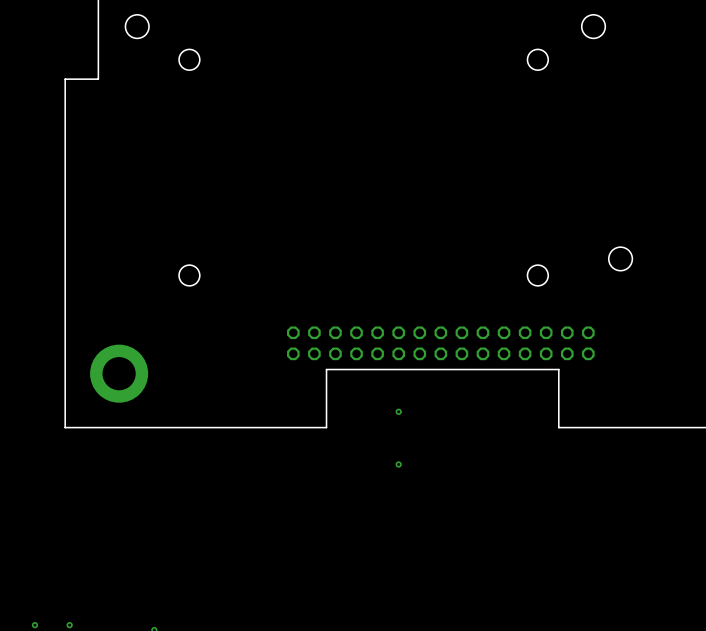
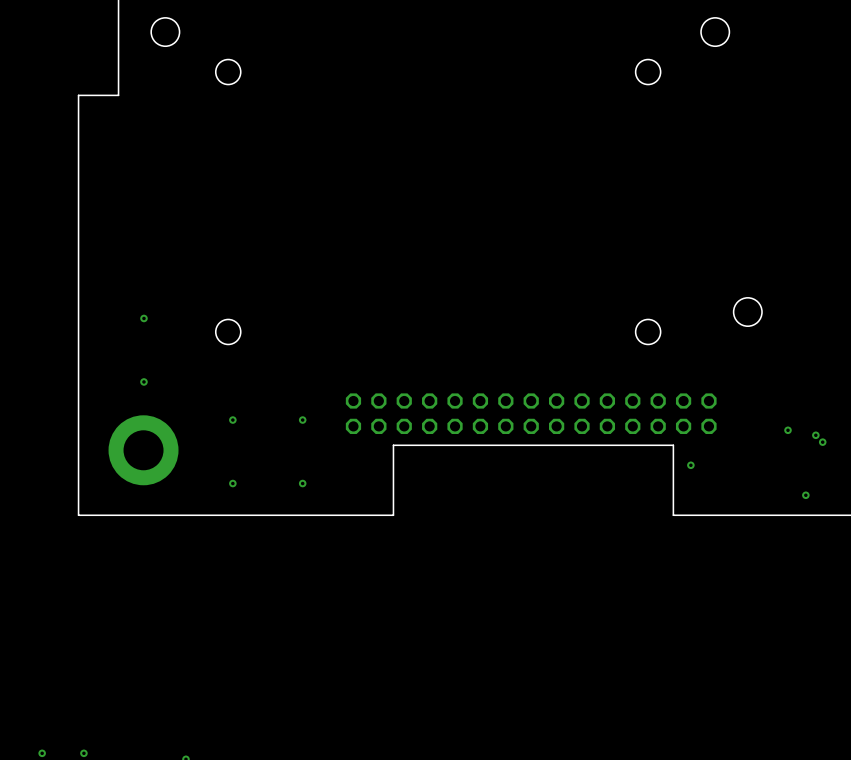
via: none -> (143, 318)
via: none -> (143, 381)
via: none -> (232, 420)
via: none -> (302, 420)
via: none -> (788, 430)
via: none -> (815, 435)
via: none -> (822, 442)
via: none -> (690, 465)
via: none -> (232, 483)
via: none -> (302, 483)
via: (398, 411) -> none
via: none -> (805, 495)
via: (398, 464) -> none

